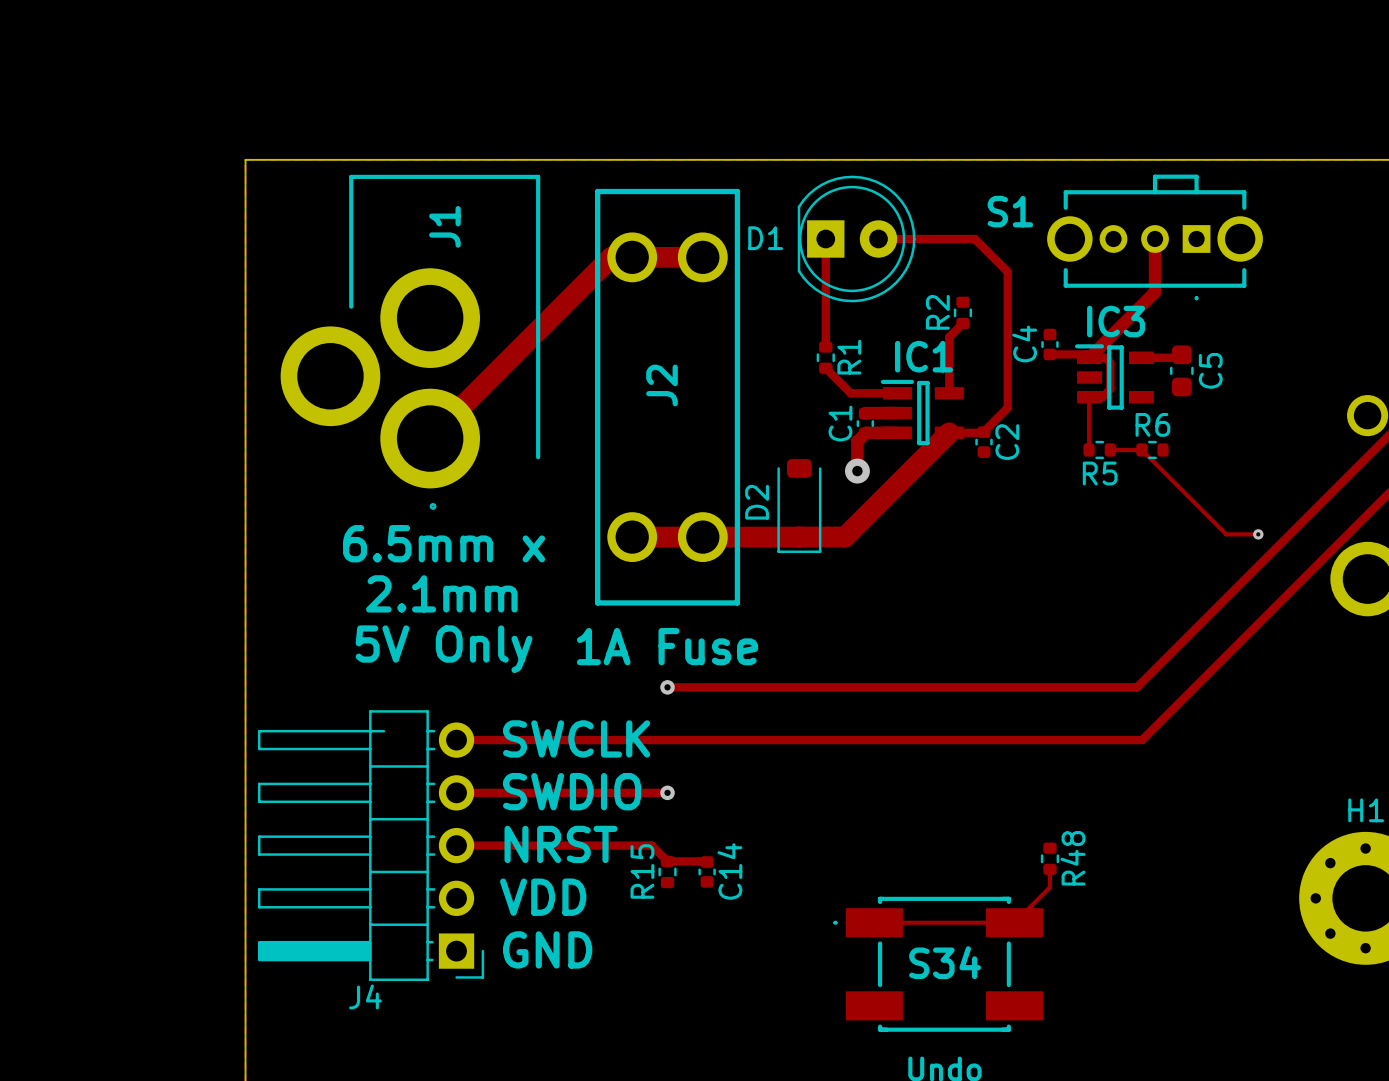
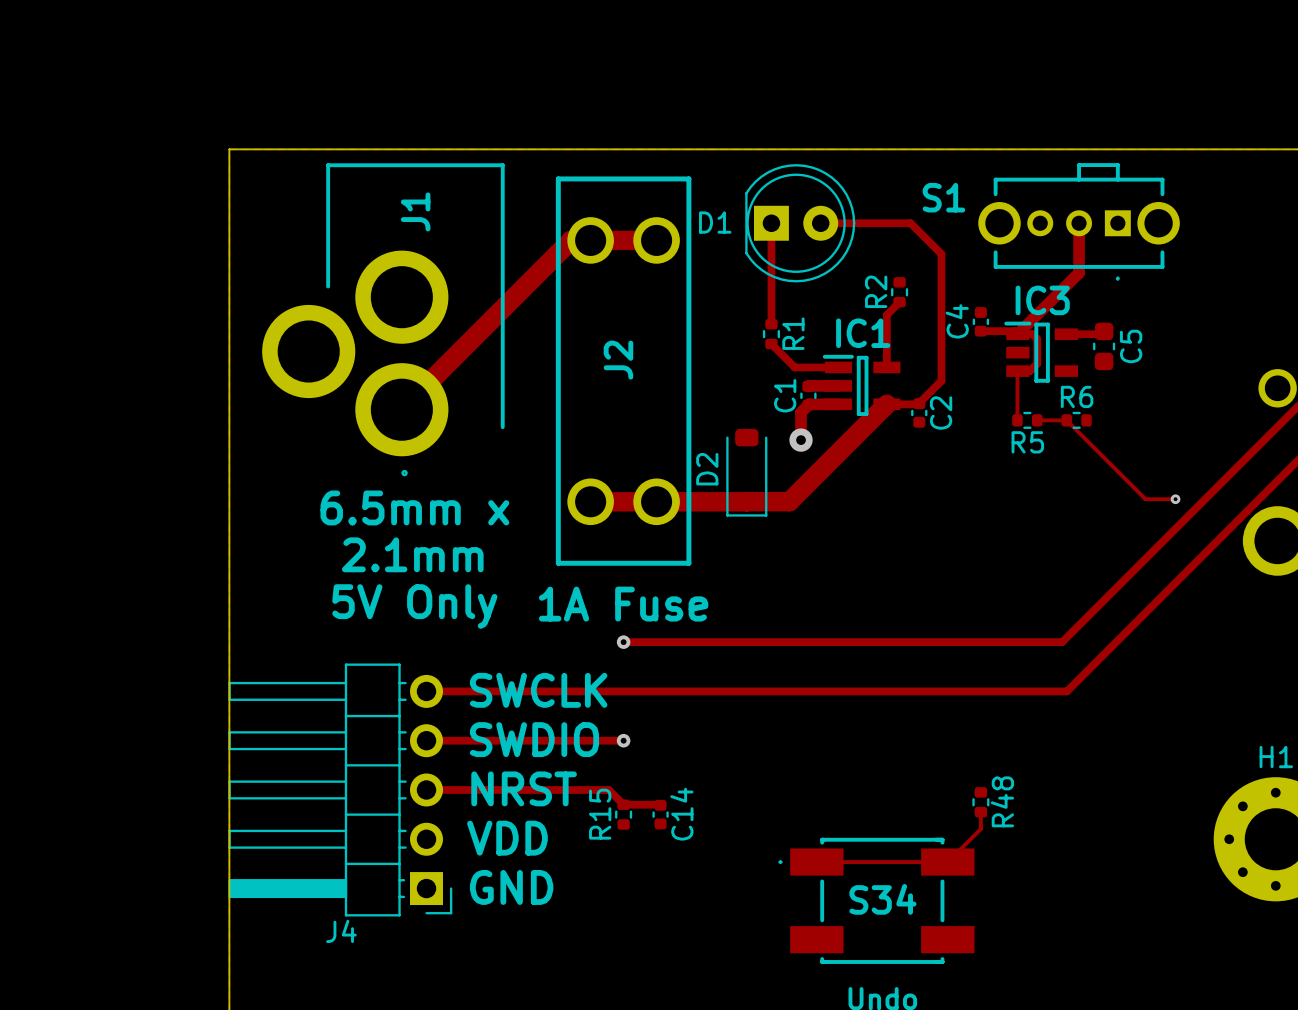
J4 footprint: [257, 710, 485, 982] -> [228, 663, 453, 917]

